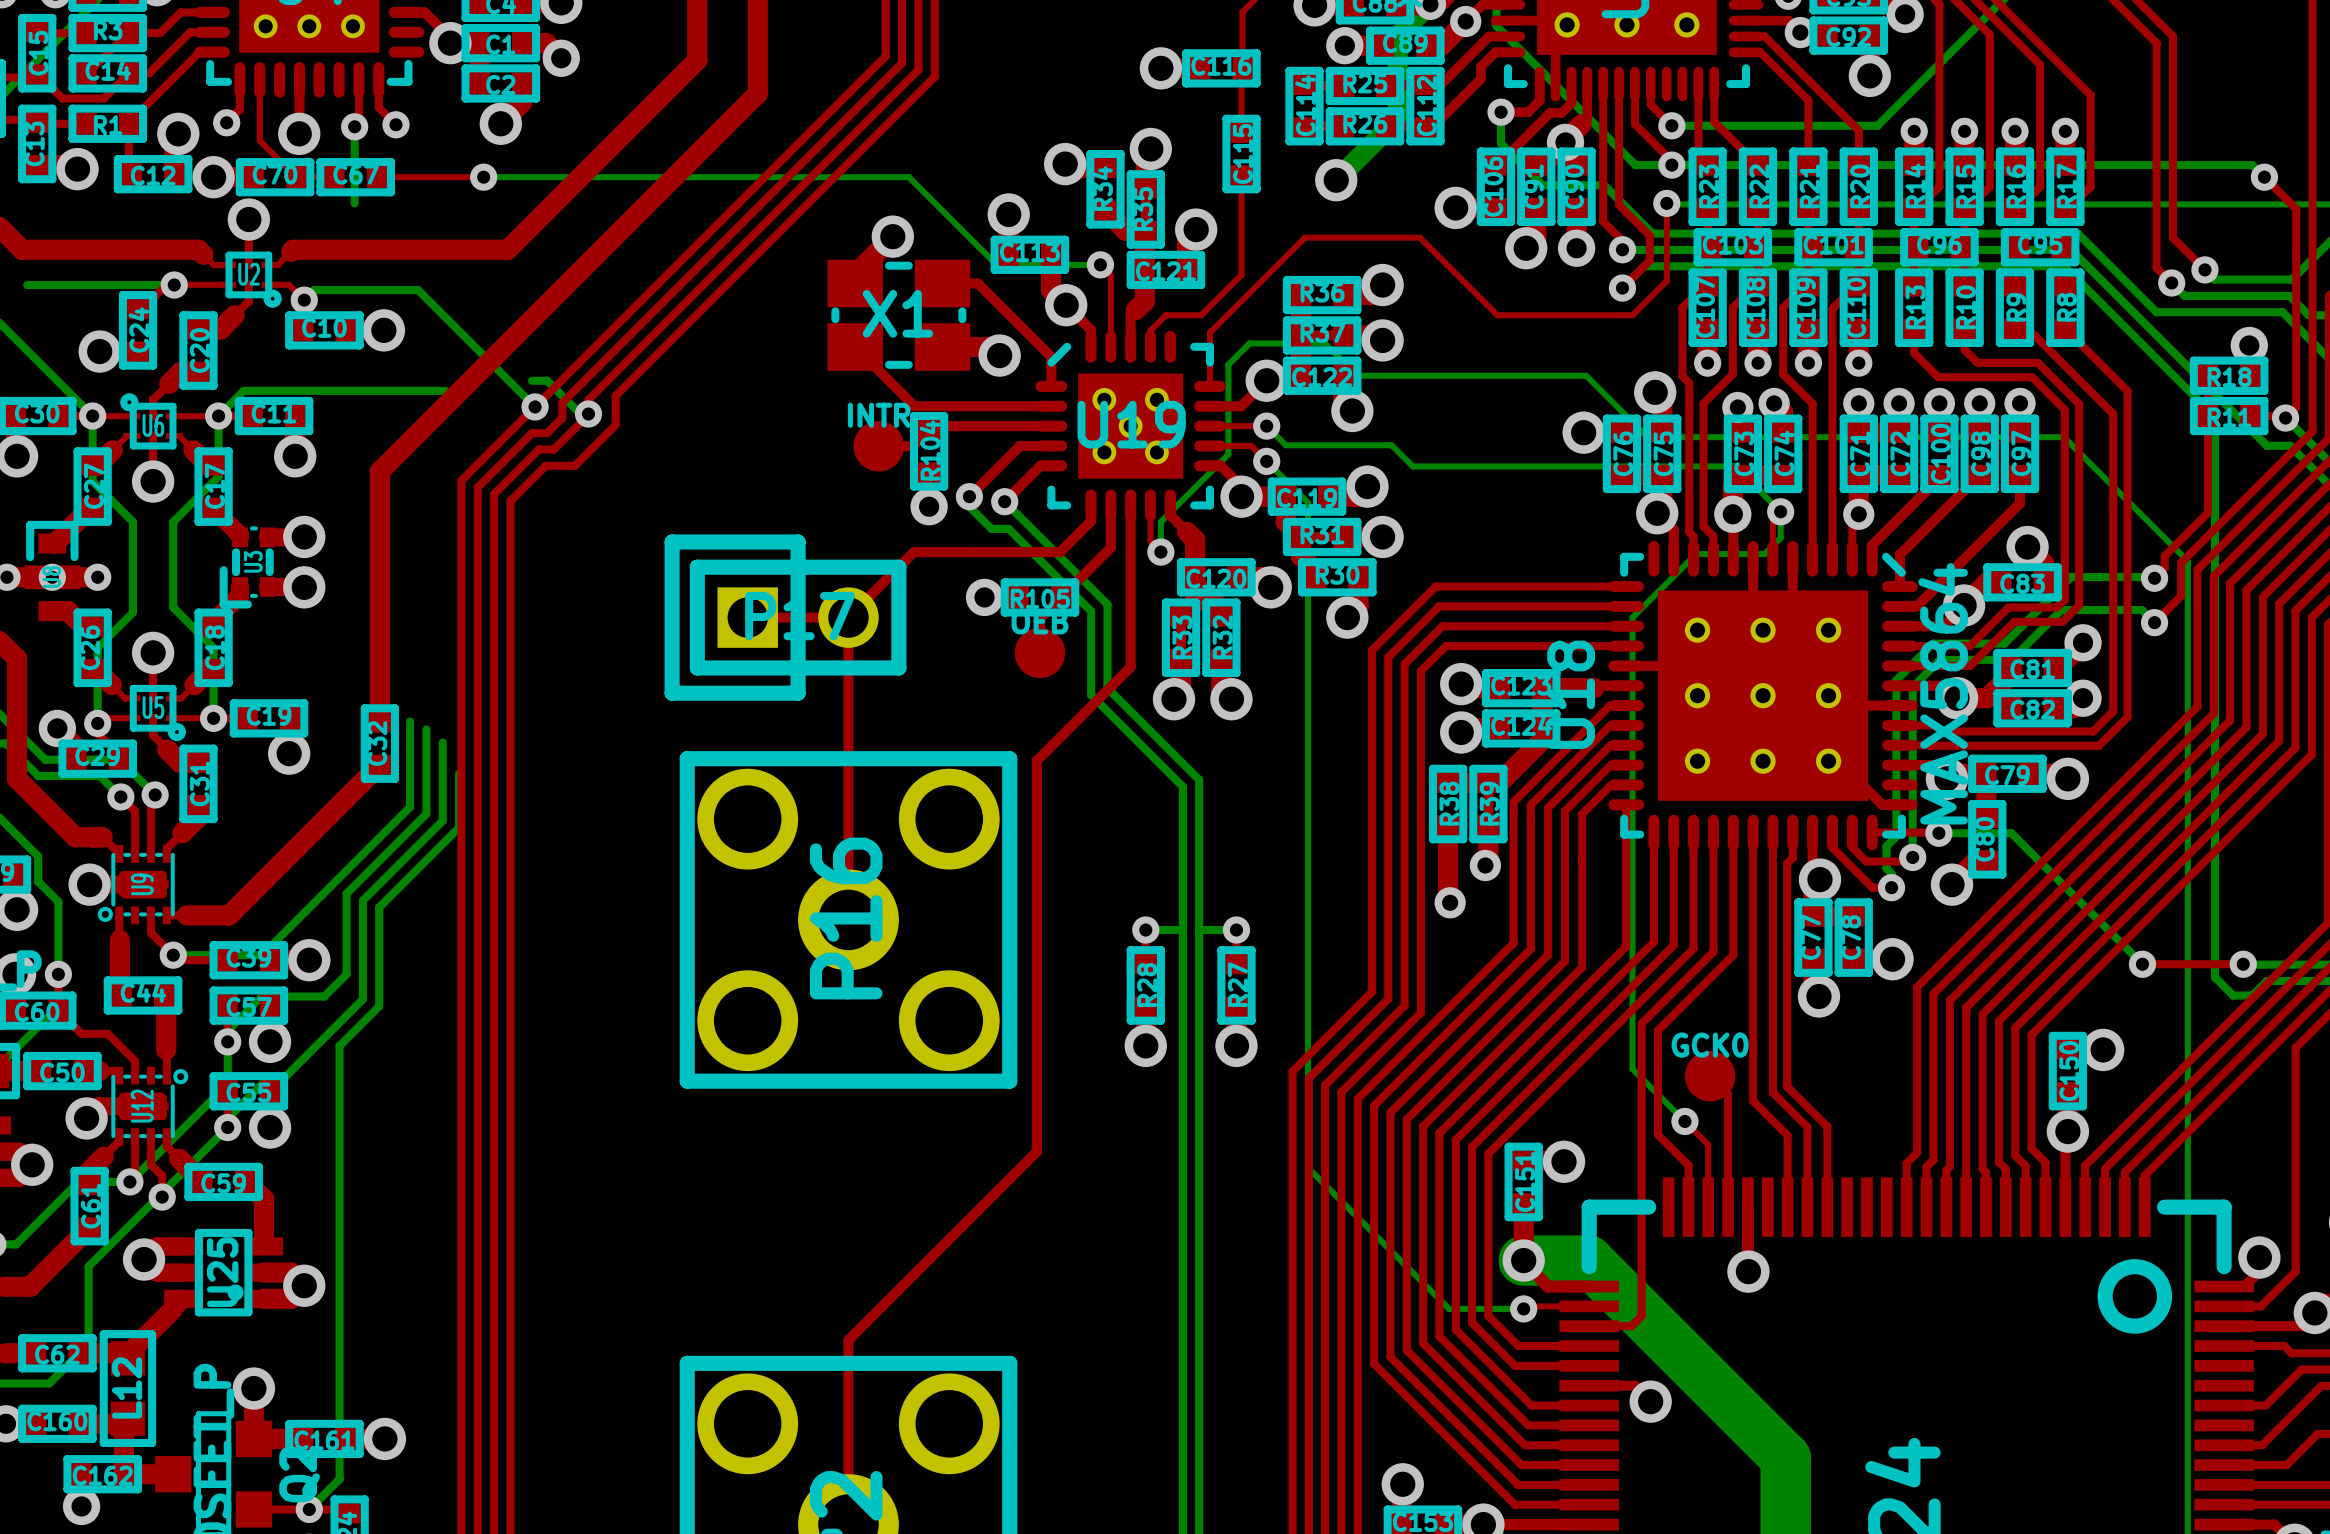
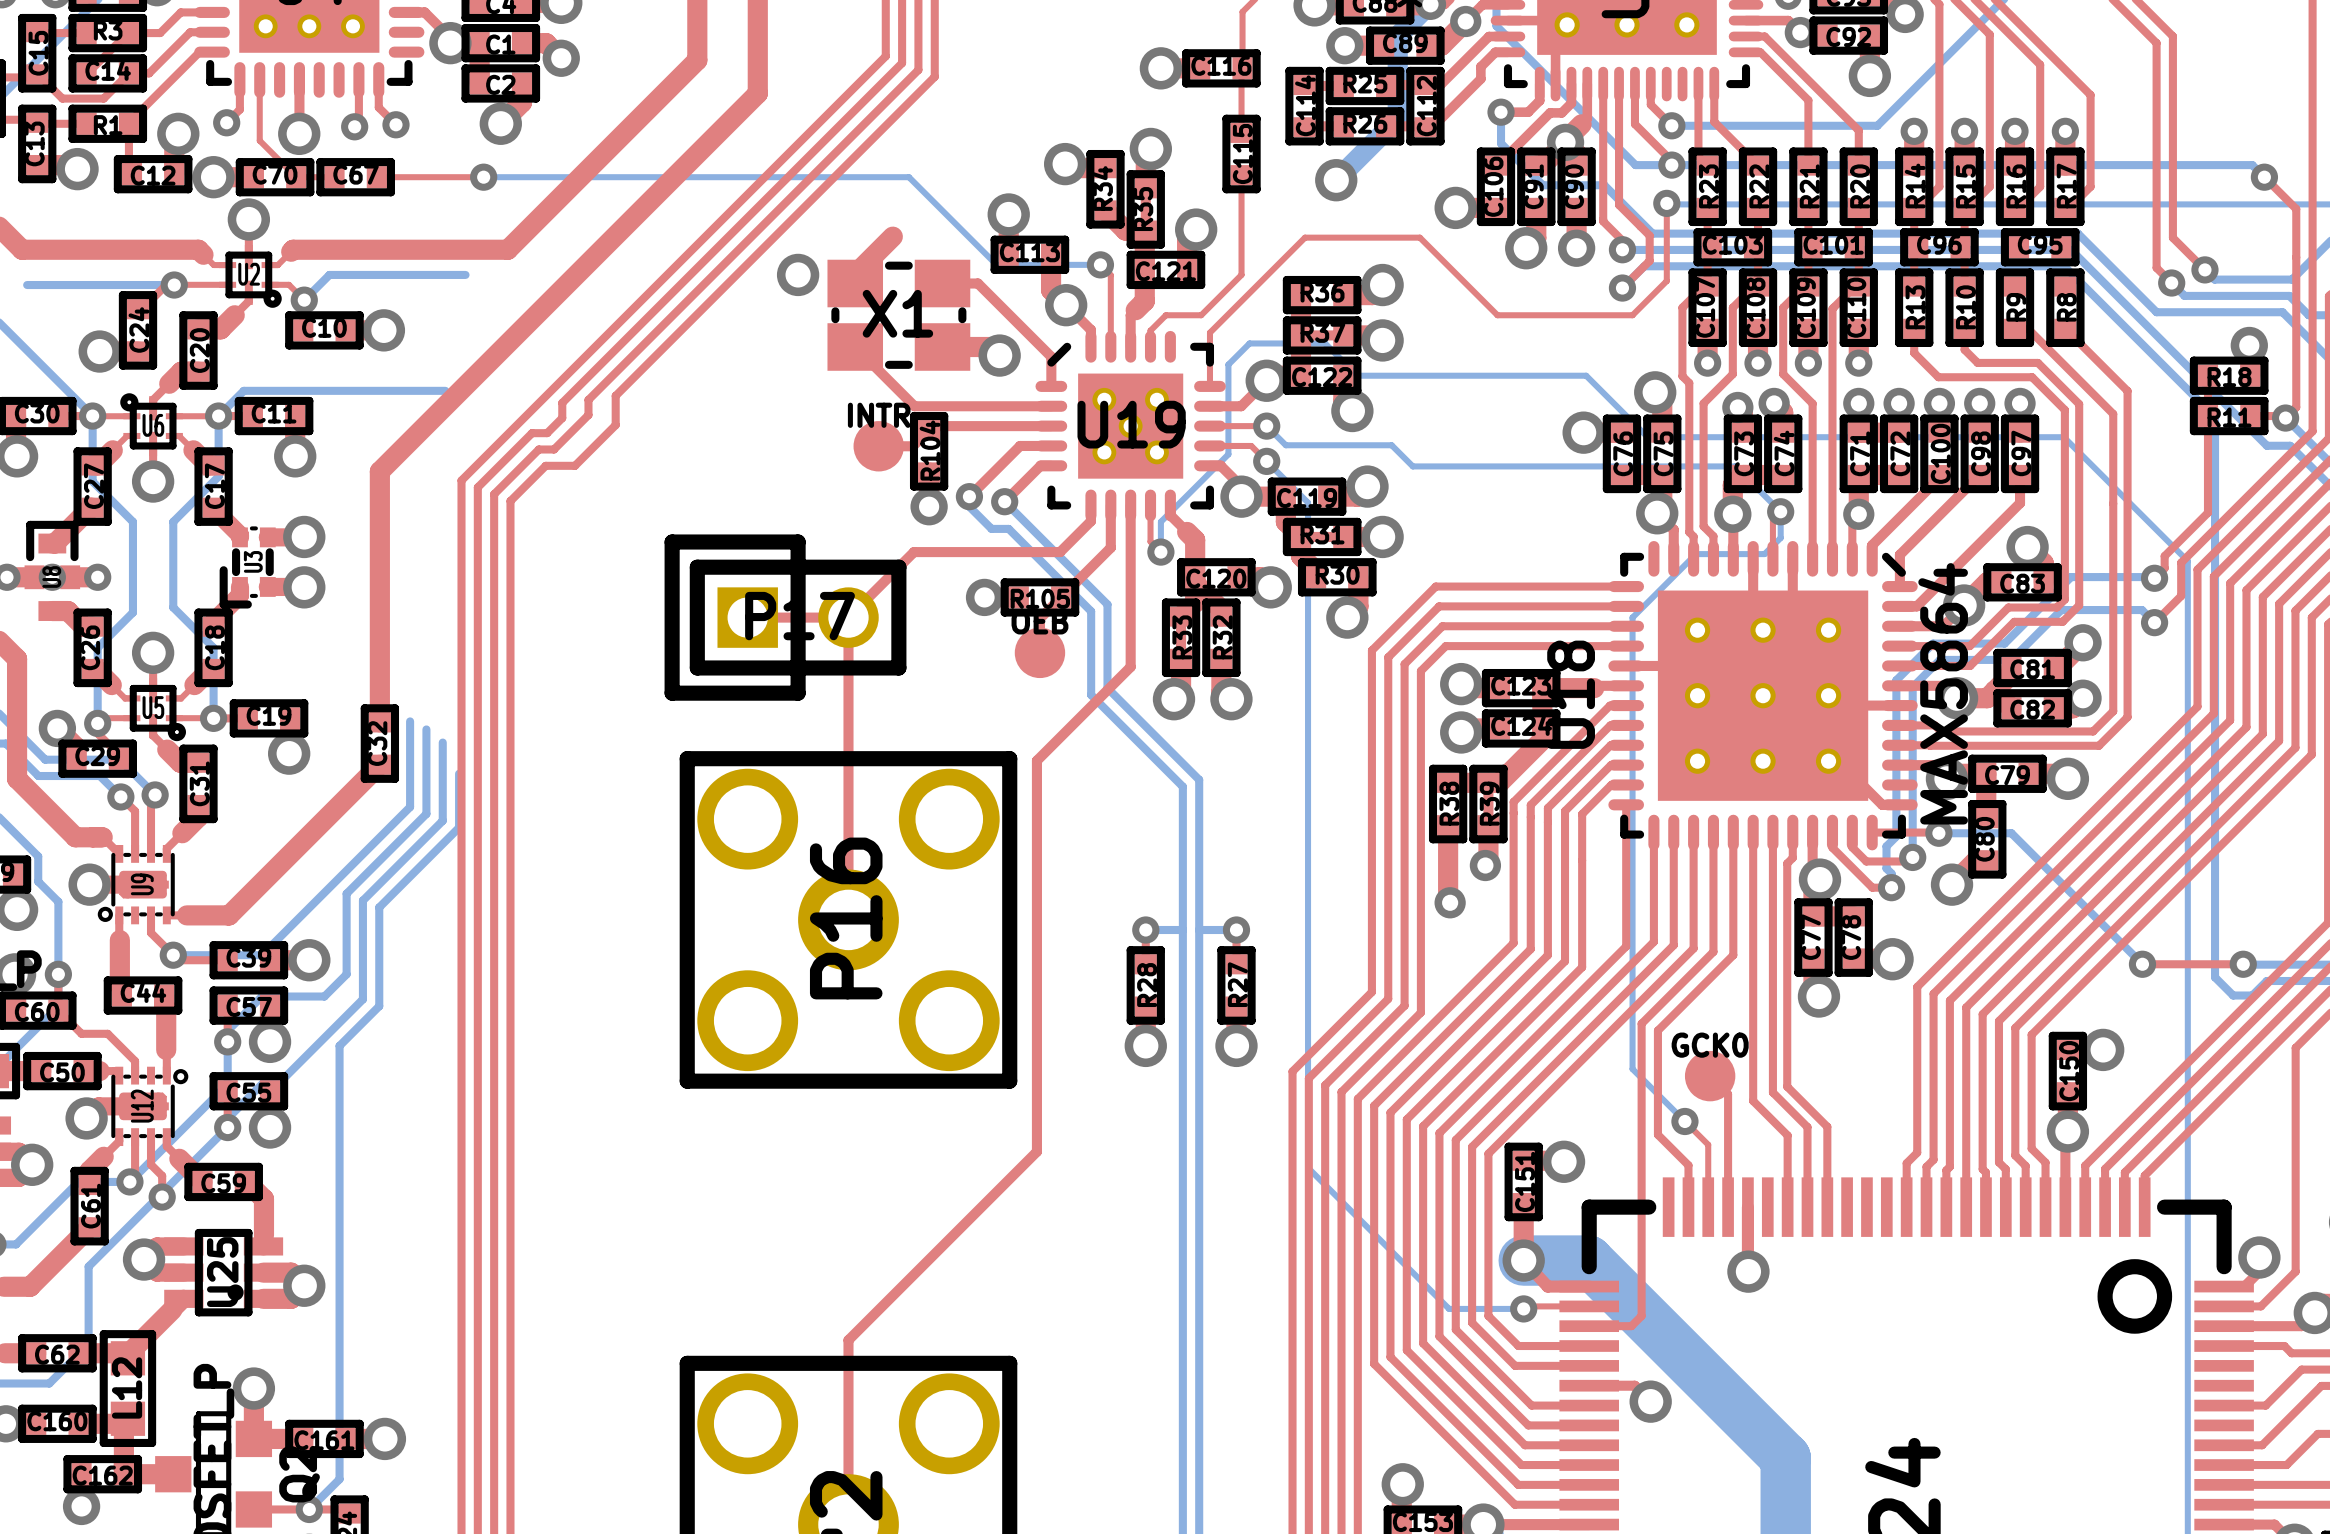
bottom track: (354, 126) (354, 203) -> none
via position: (892, 236) -> (798, 274)
bottom track: (314, 290) (418, 290) (535, 406) -> (314, 290) (329, 274) (465, 274)
bottom track: (532, 380) (547, 380) (580, 414) (588, 414) -> none
via: (535, 406) -> none
via: (588, 414) -> none

